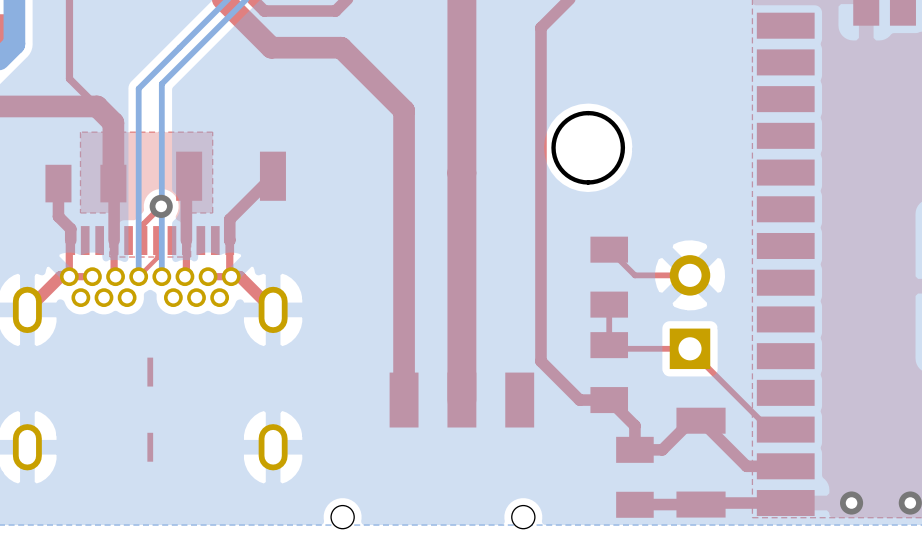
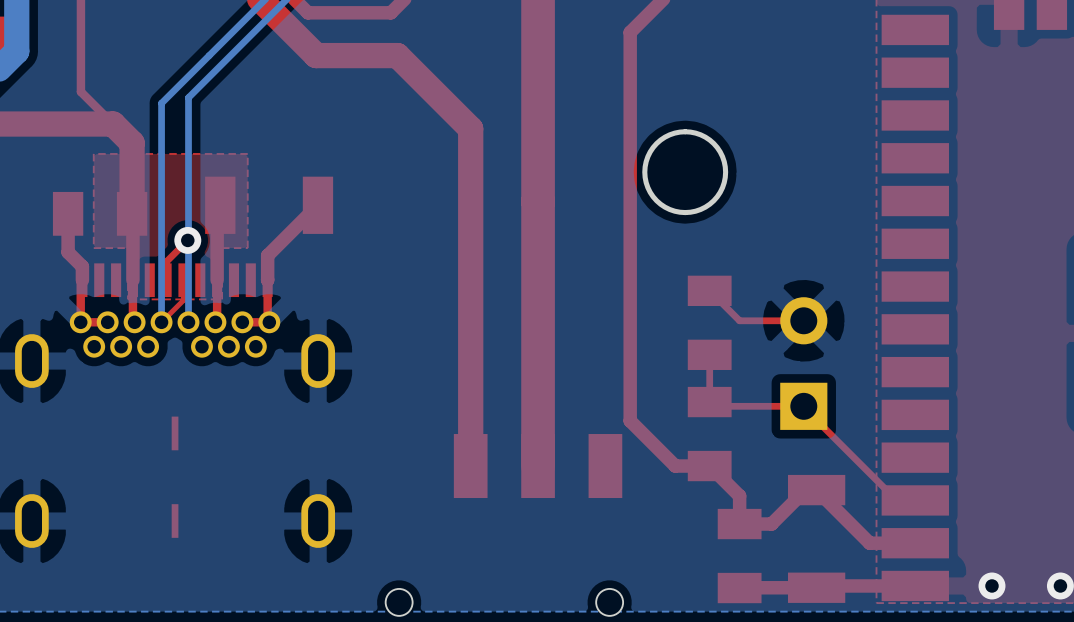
top track: (69, 276) (60, 276) (27, 309) -> none
top track: (231, 276) (239, 276) (273, 309) -> none

